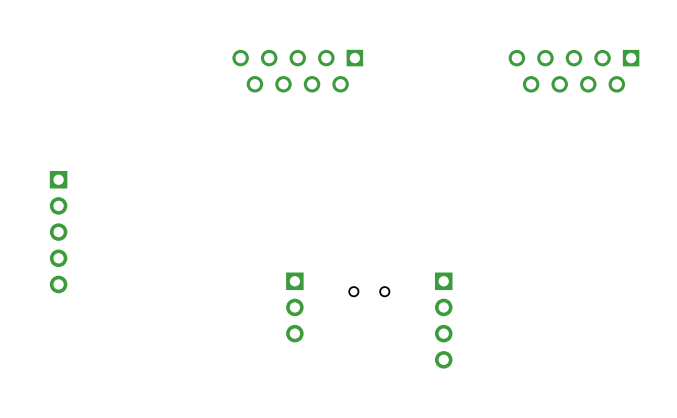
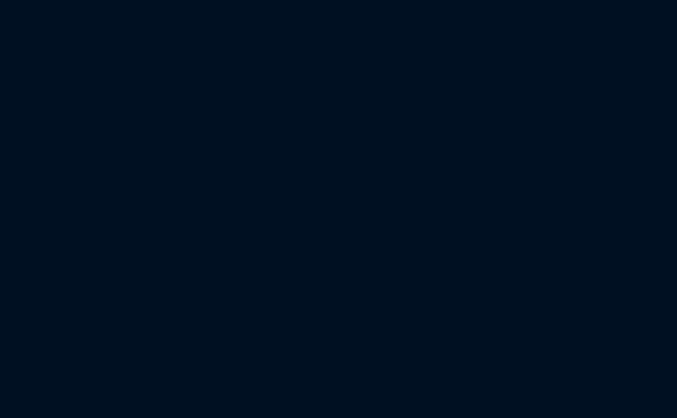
part: (297, 71) -> none
part: (573, 71) -> none
part: (58, 232) -> none
part: (369, 291) -> none
part: (294, 307) -> none
part: (443, 320) -> none

